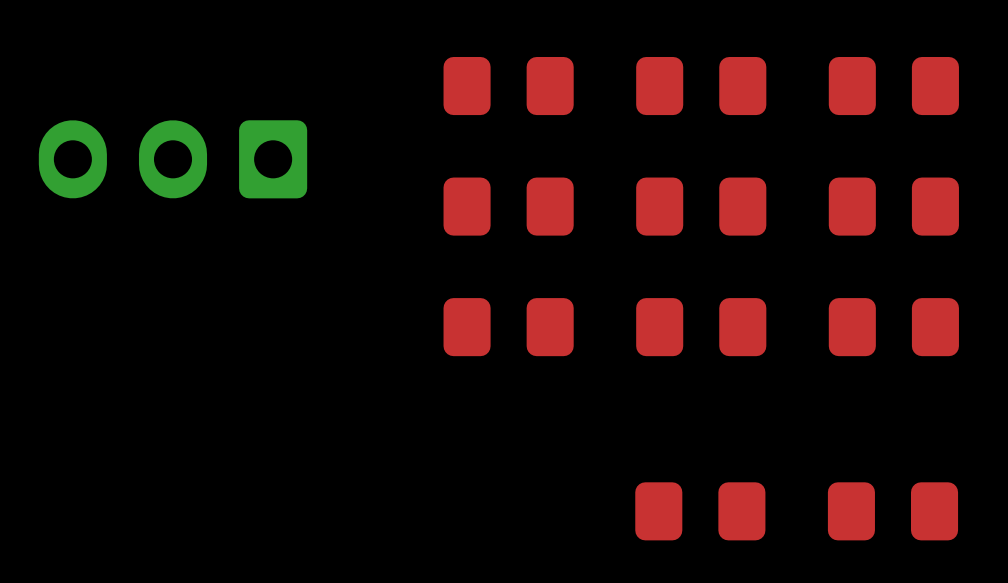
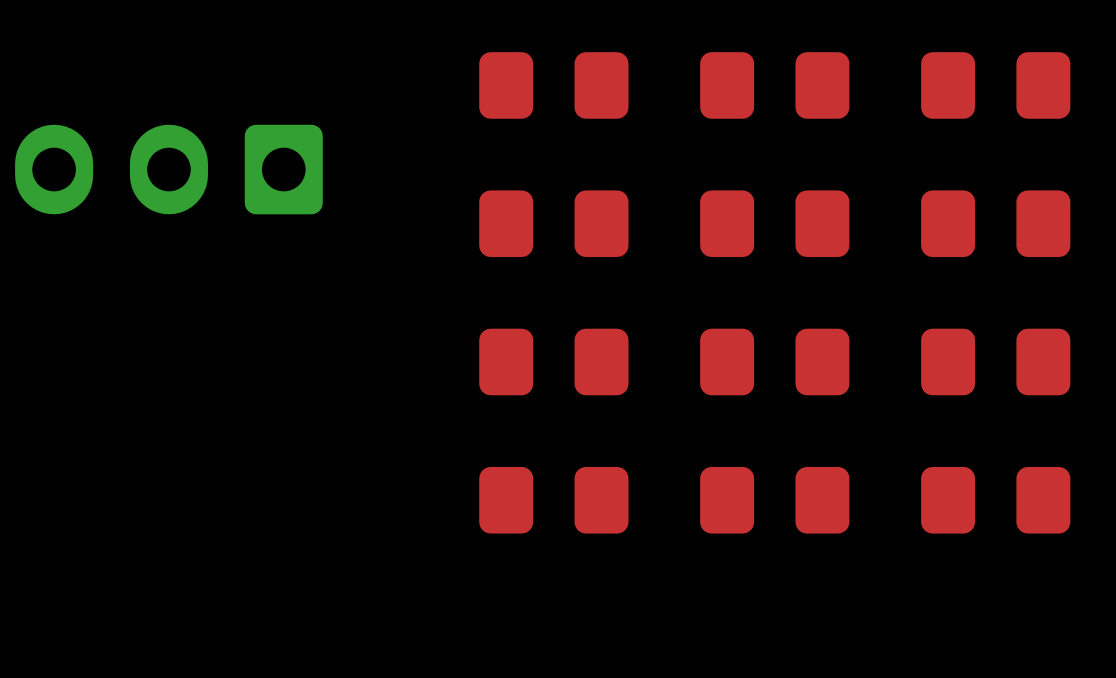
part: none -> (553, 500)
part position: (700, 511) -> (774, 500)
part position: (892, 511) -> (995, 500)

